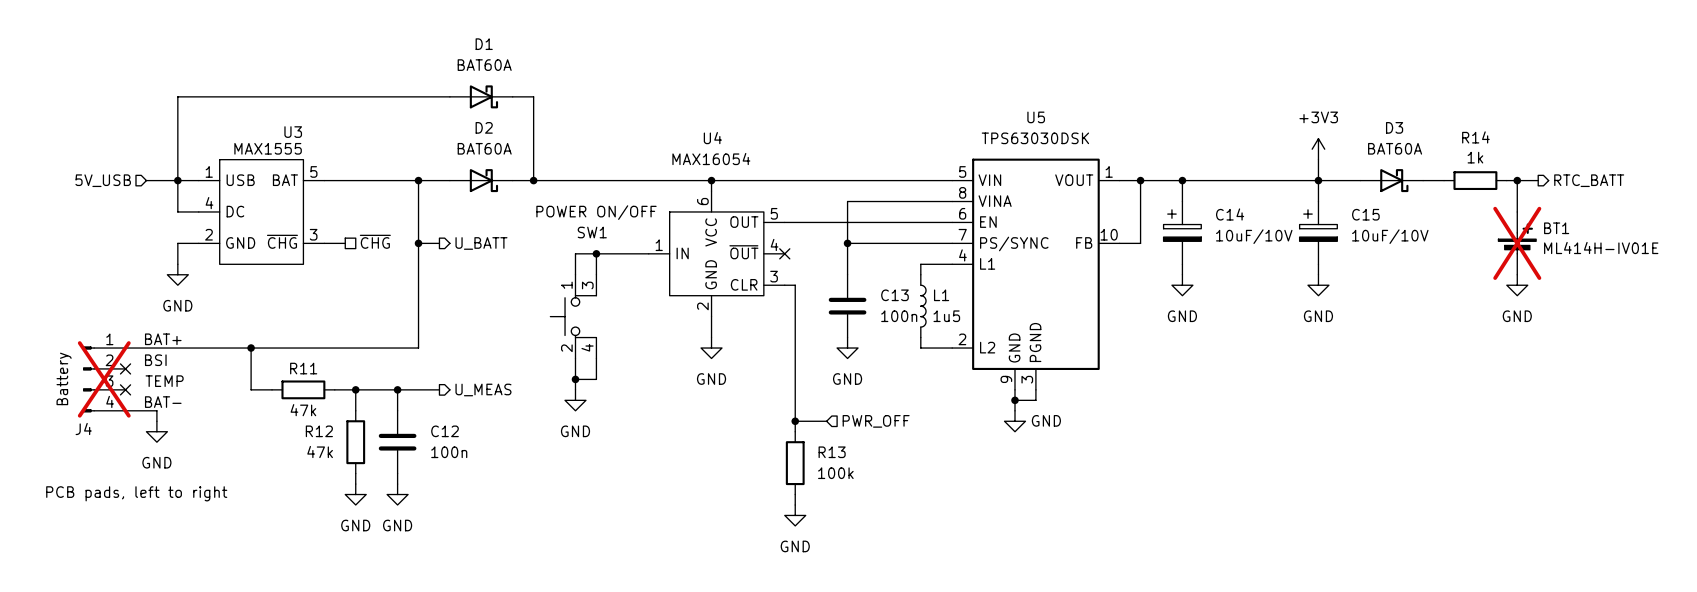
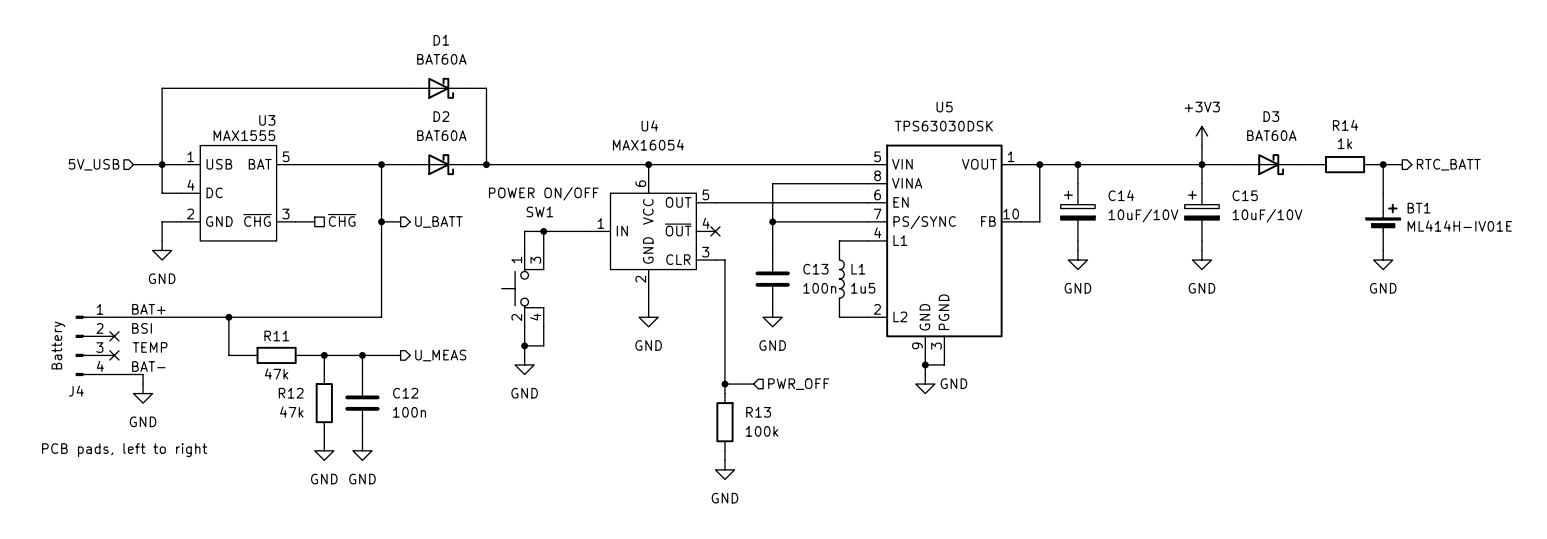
BT1 do-not-place cross: (1517, 243) -> none
J4 do-not-place cross: (104, 379) -> none

